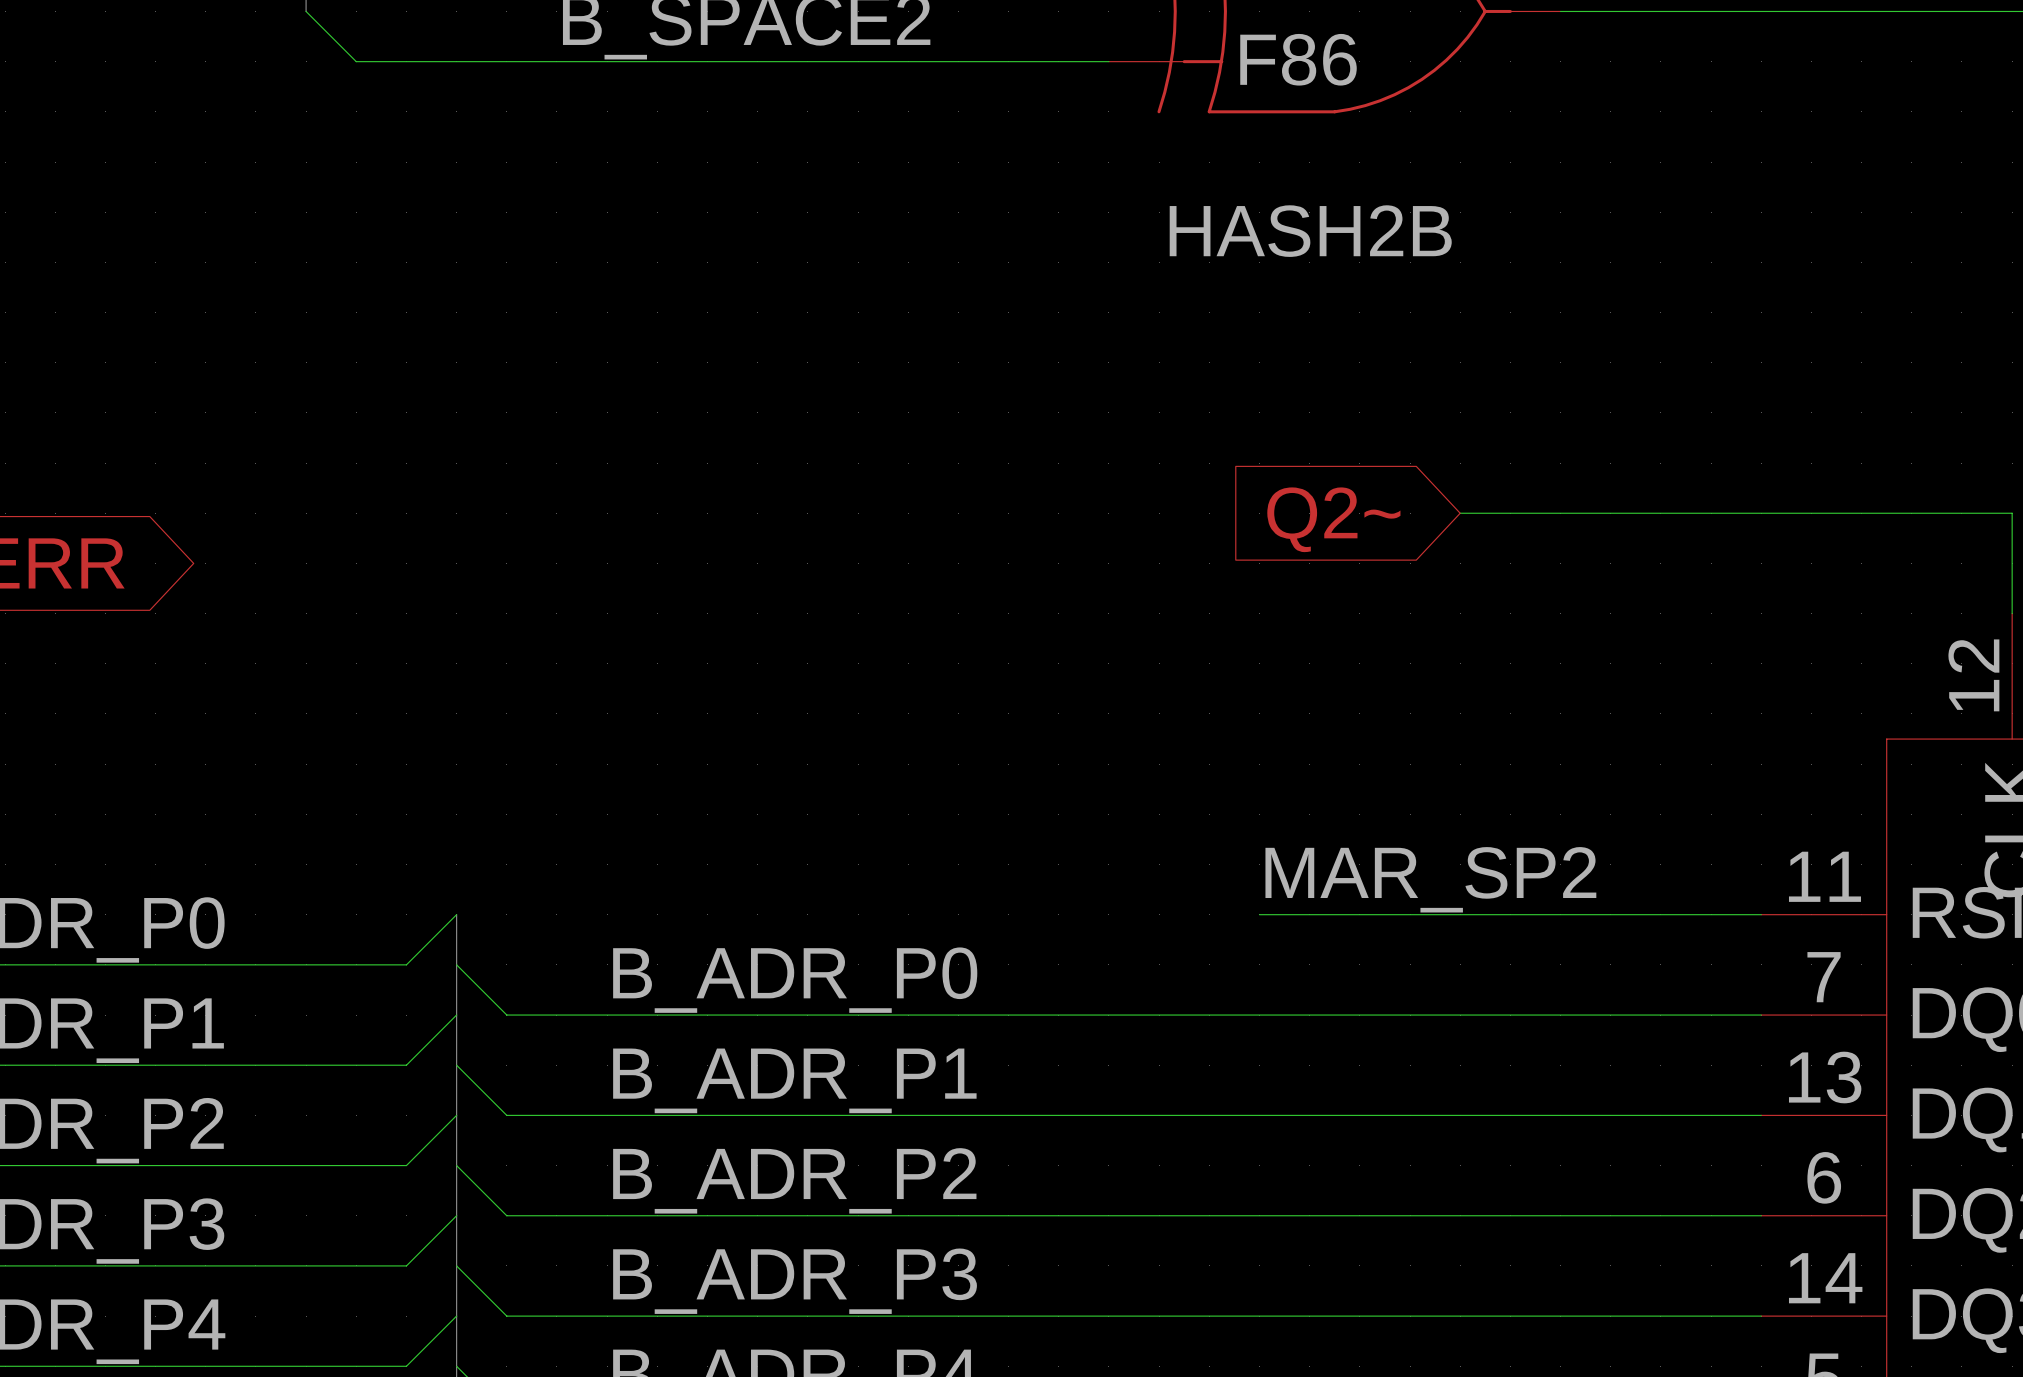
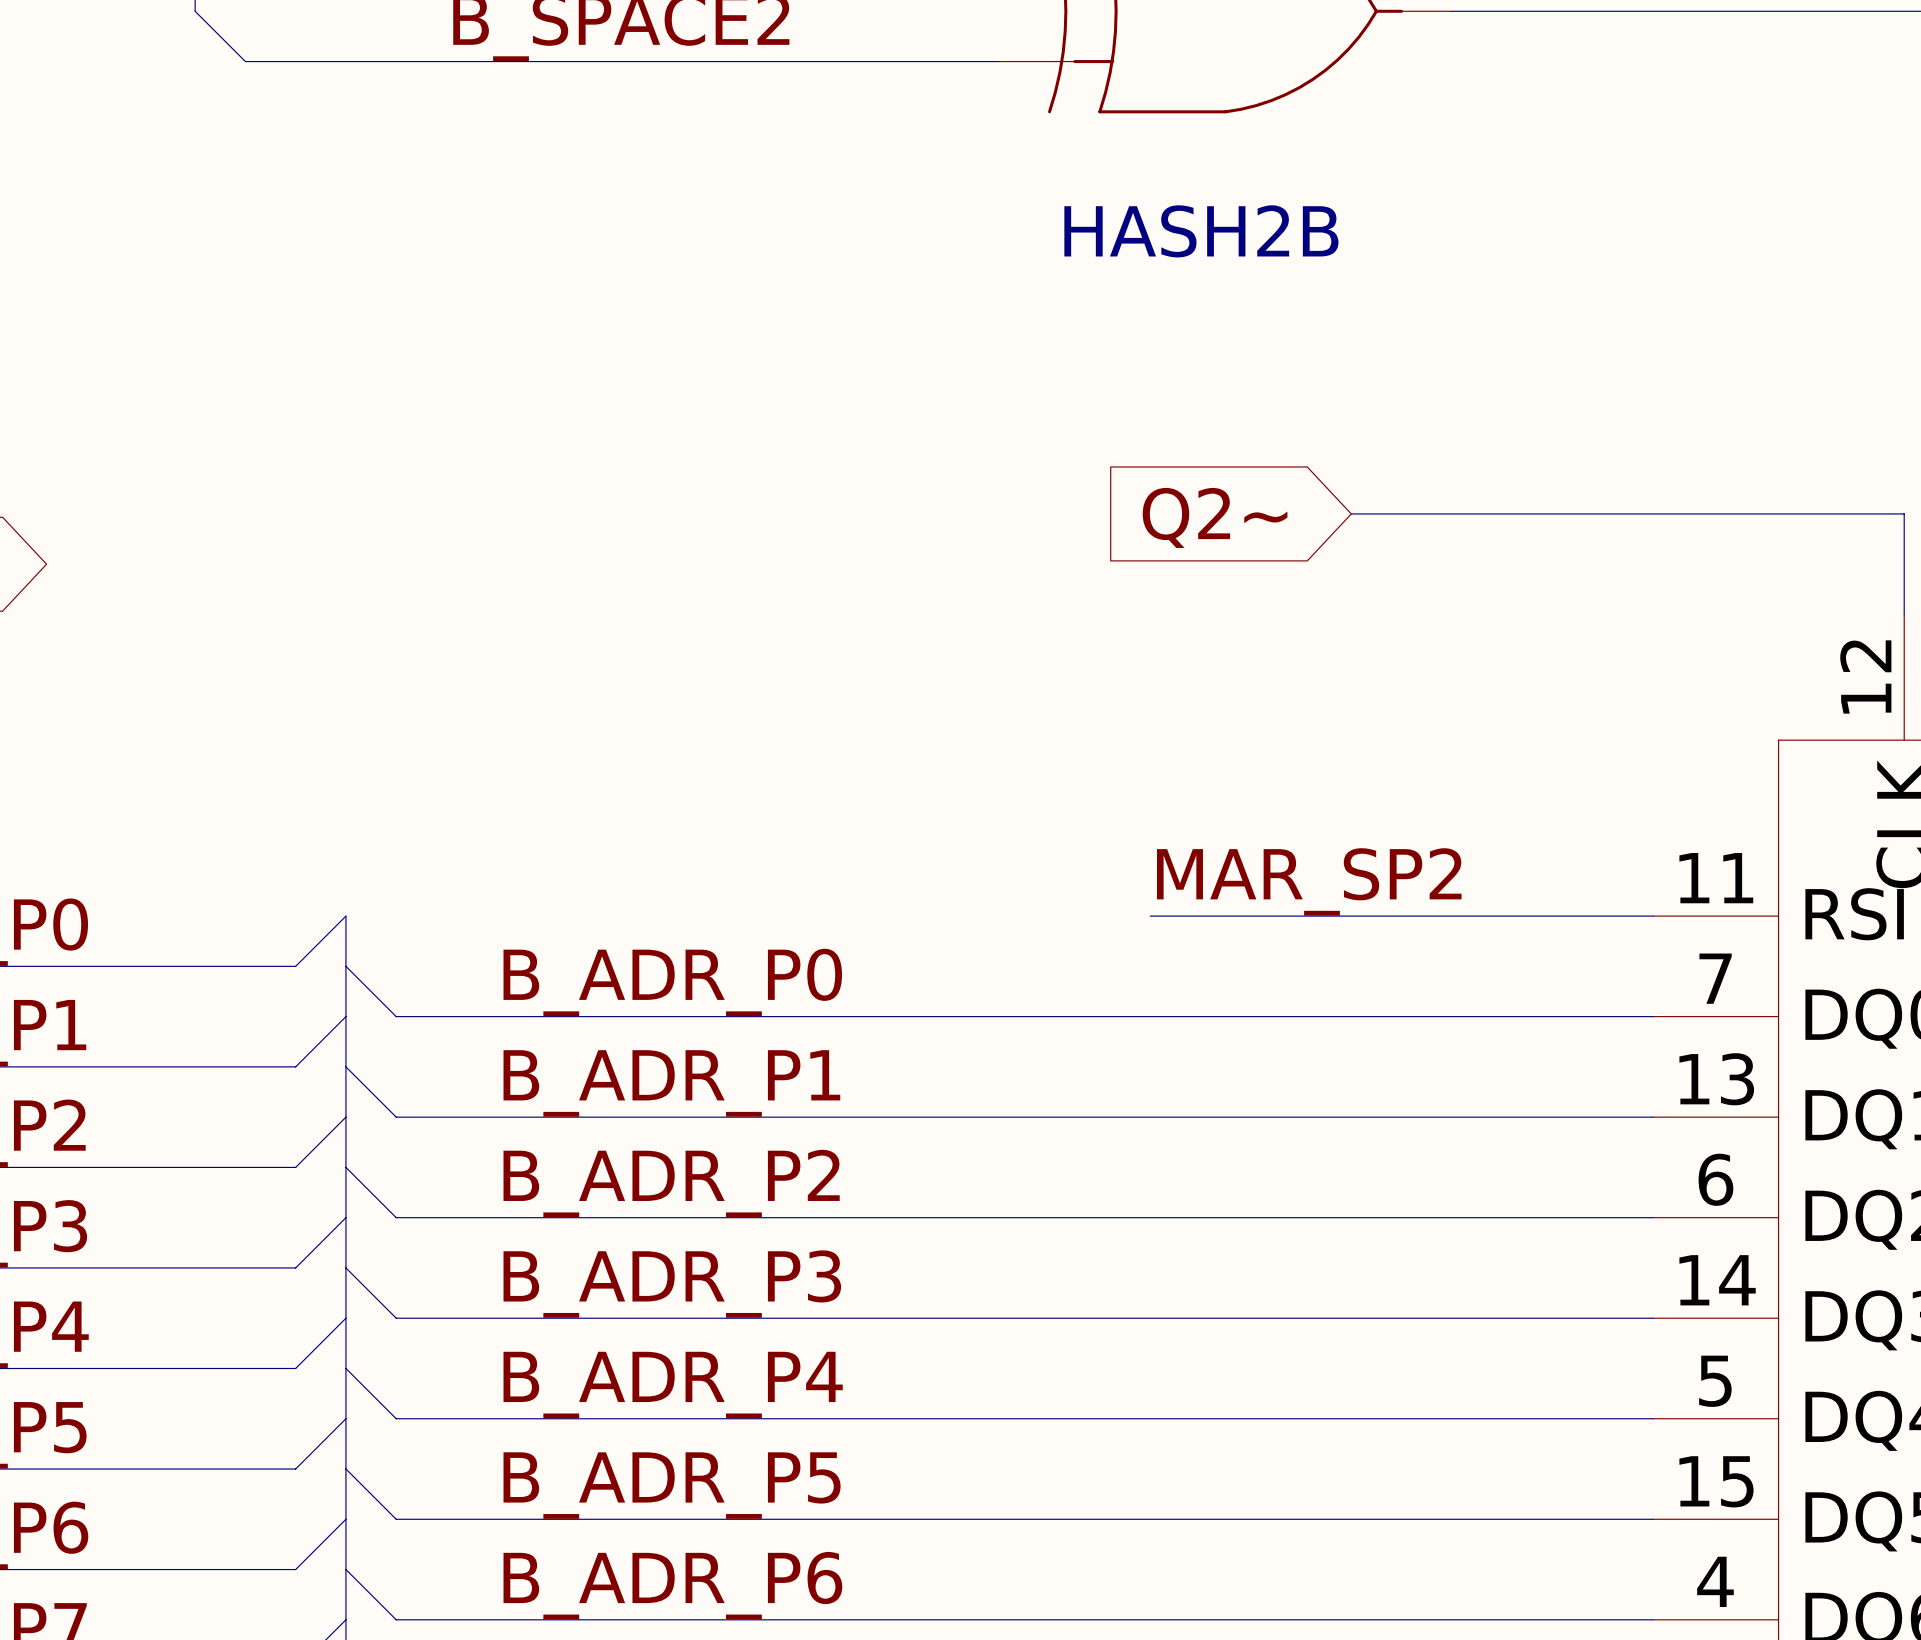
part value: F86 (1298, 59) -> none

